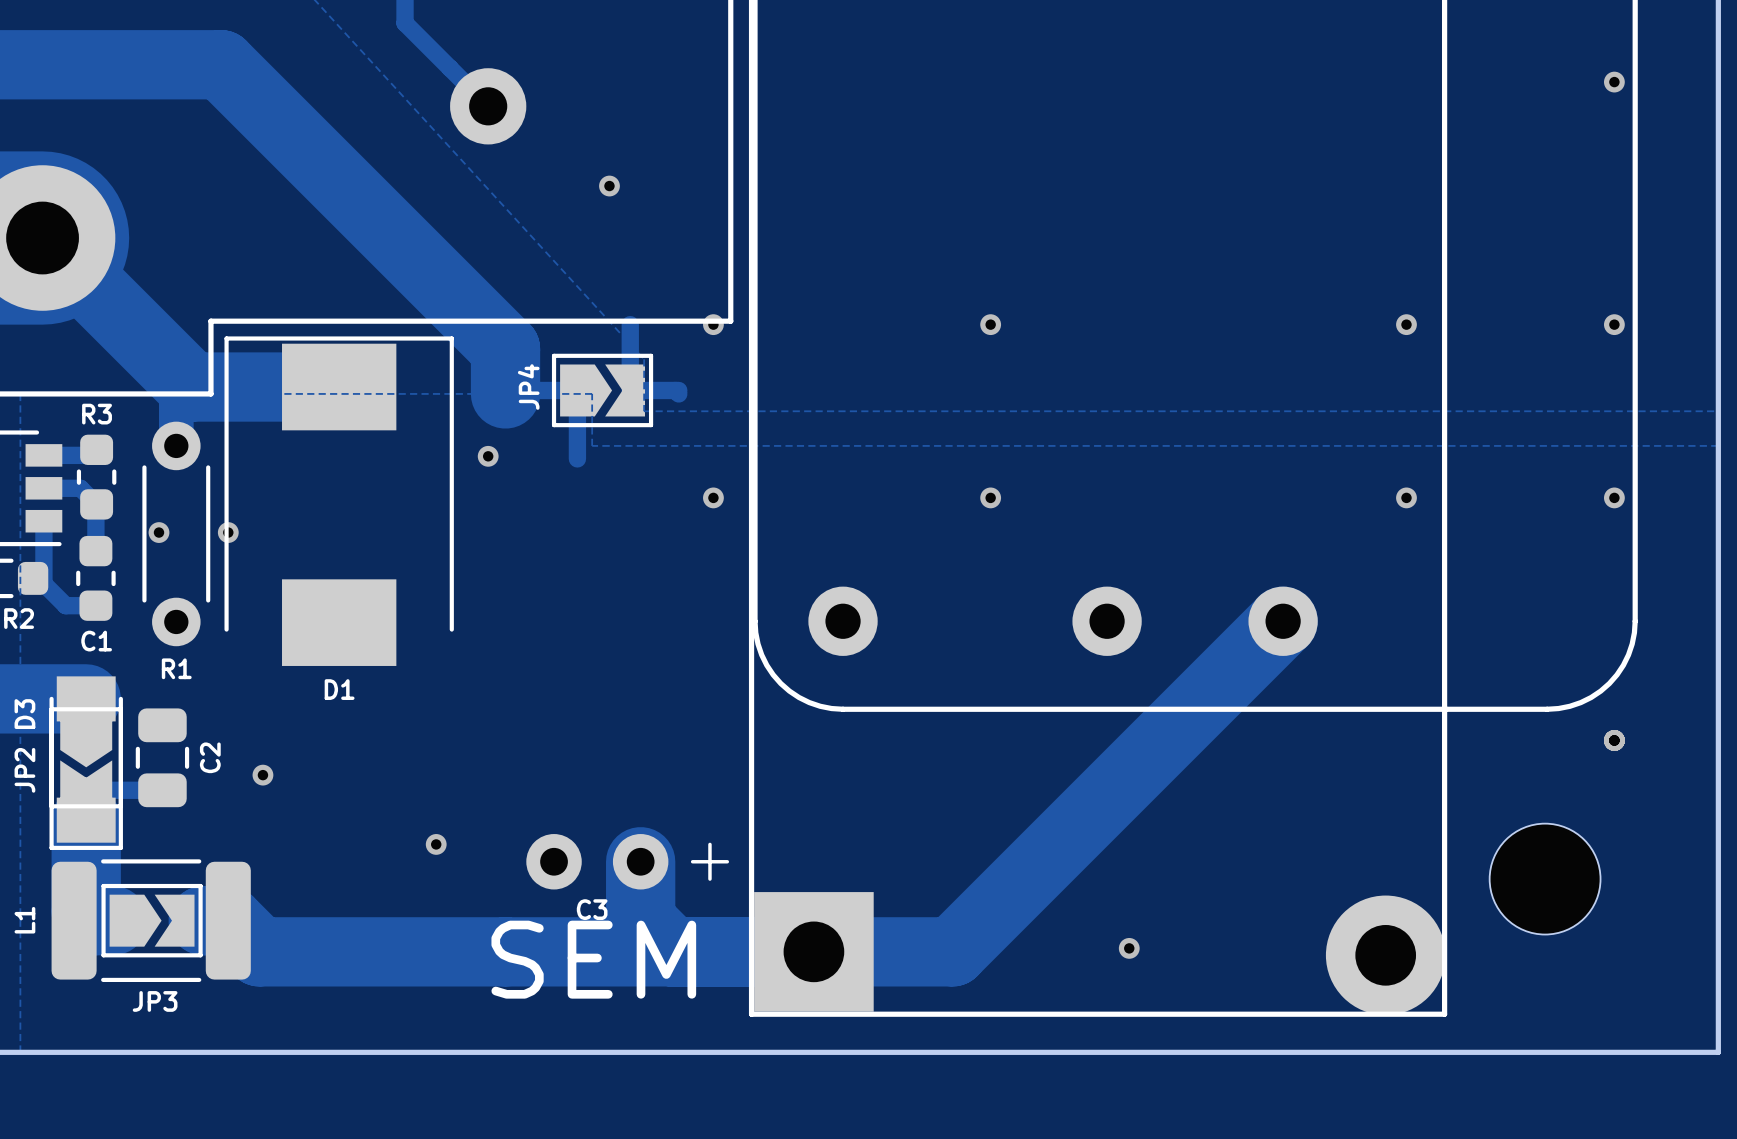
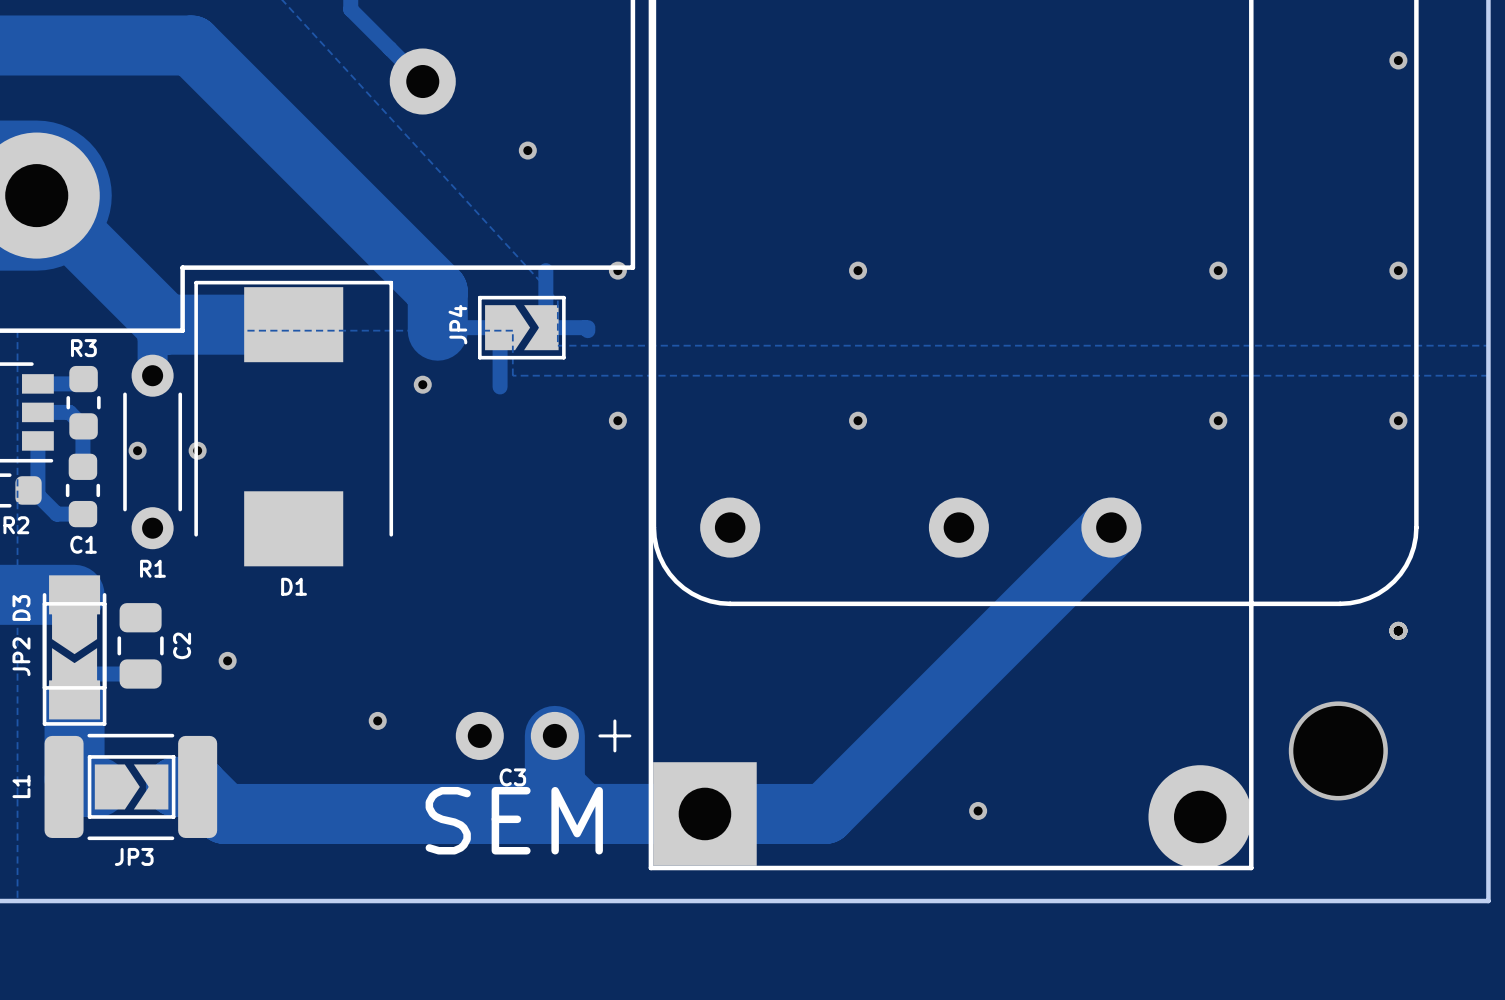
part: (1545, 879) -> none
via: none -> (1338, 750)

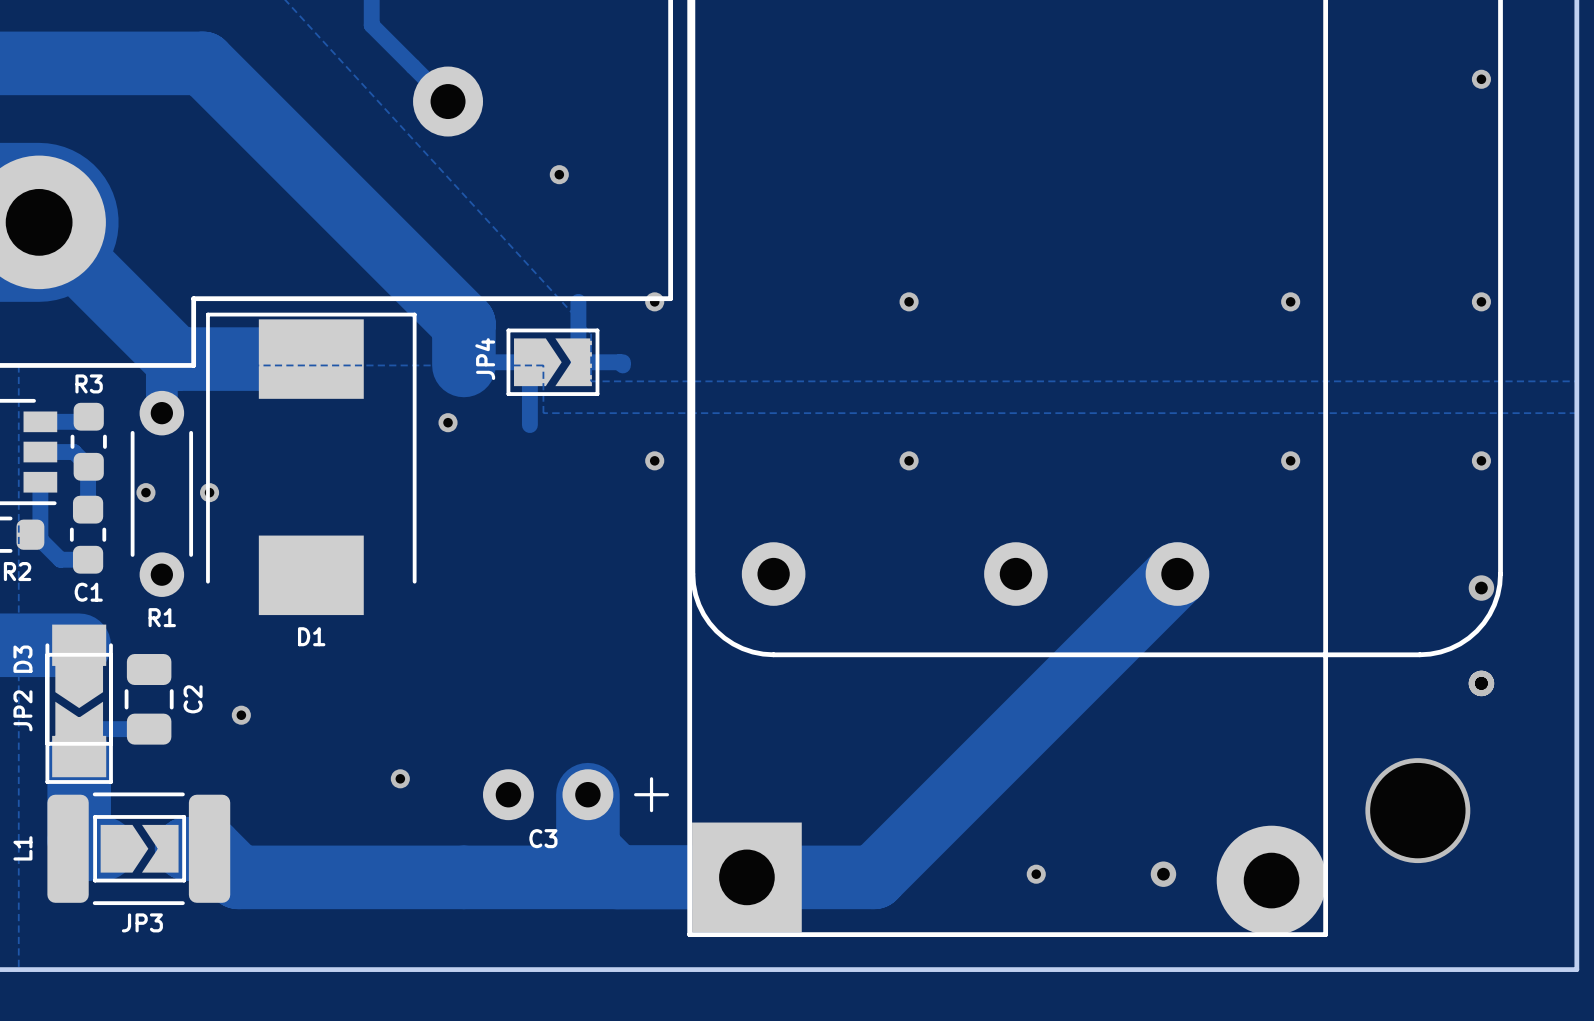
via: none -> (1481, 588)
via: none -> (1481, 683)
via: none -> (1163, 874)
text: SEM (514, 820) -> none

